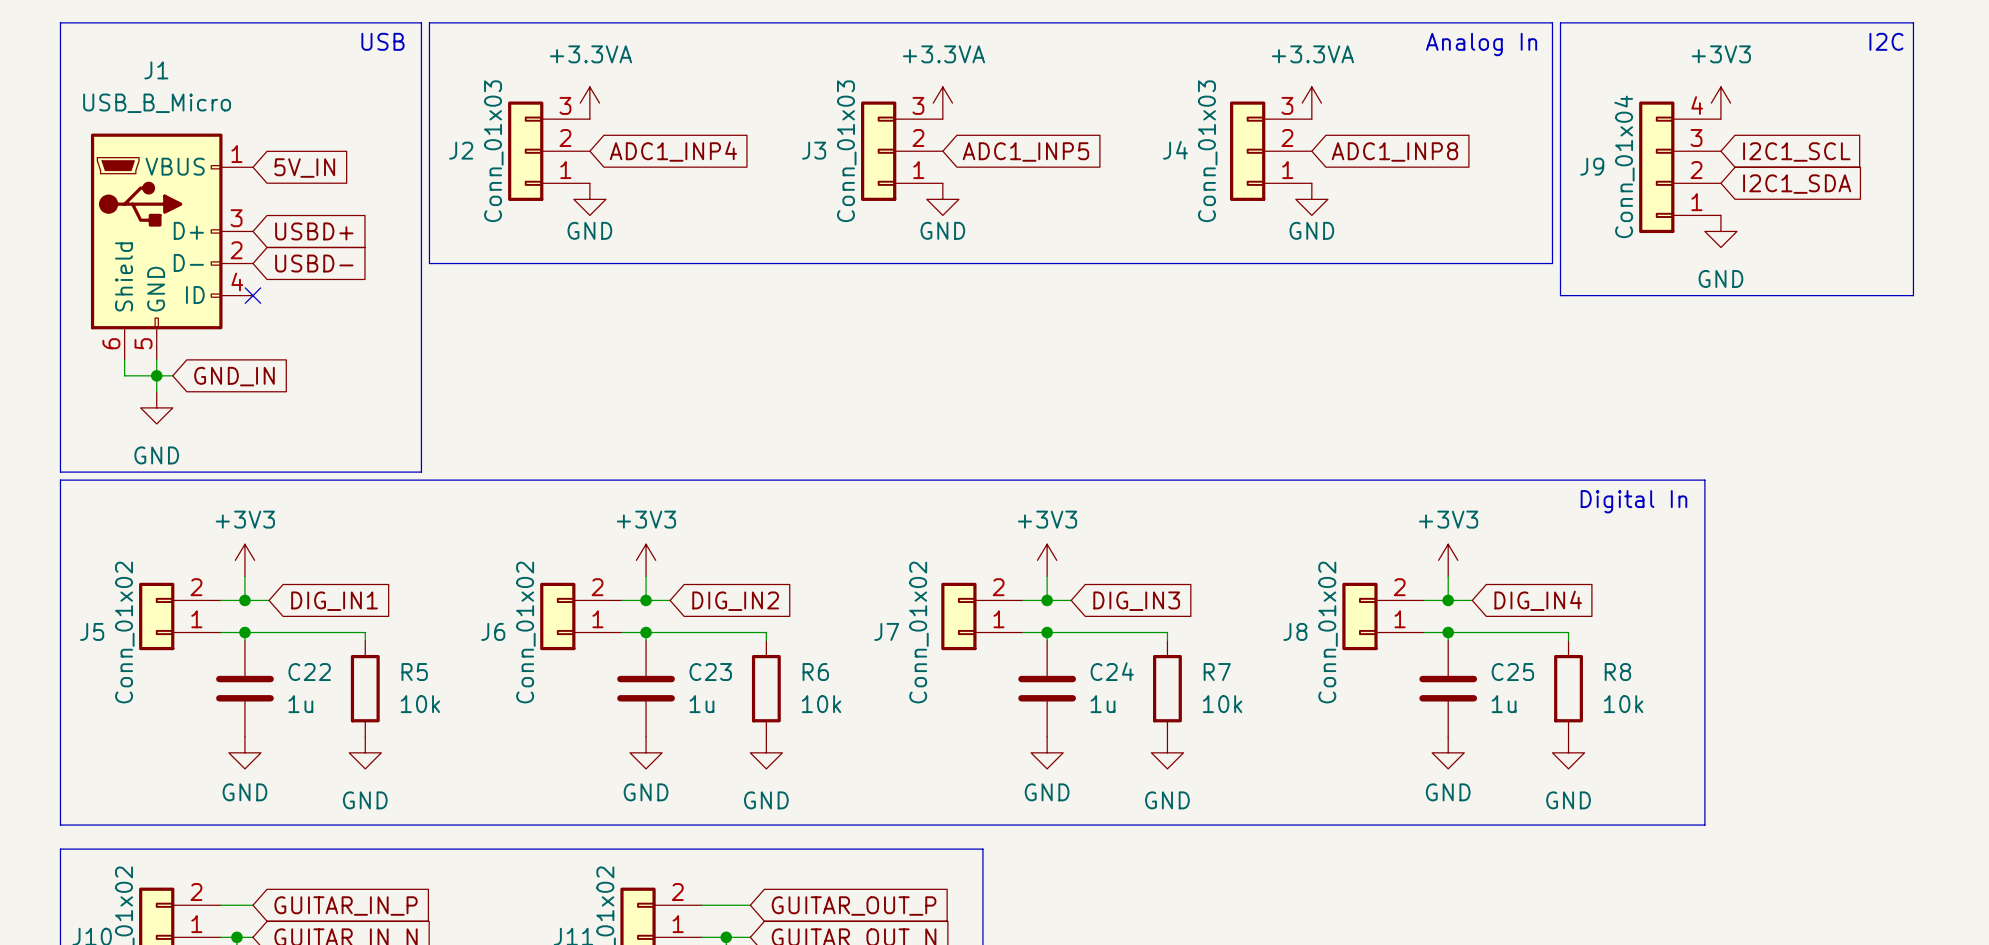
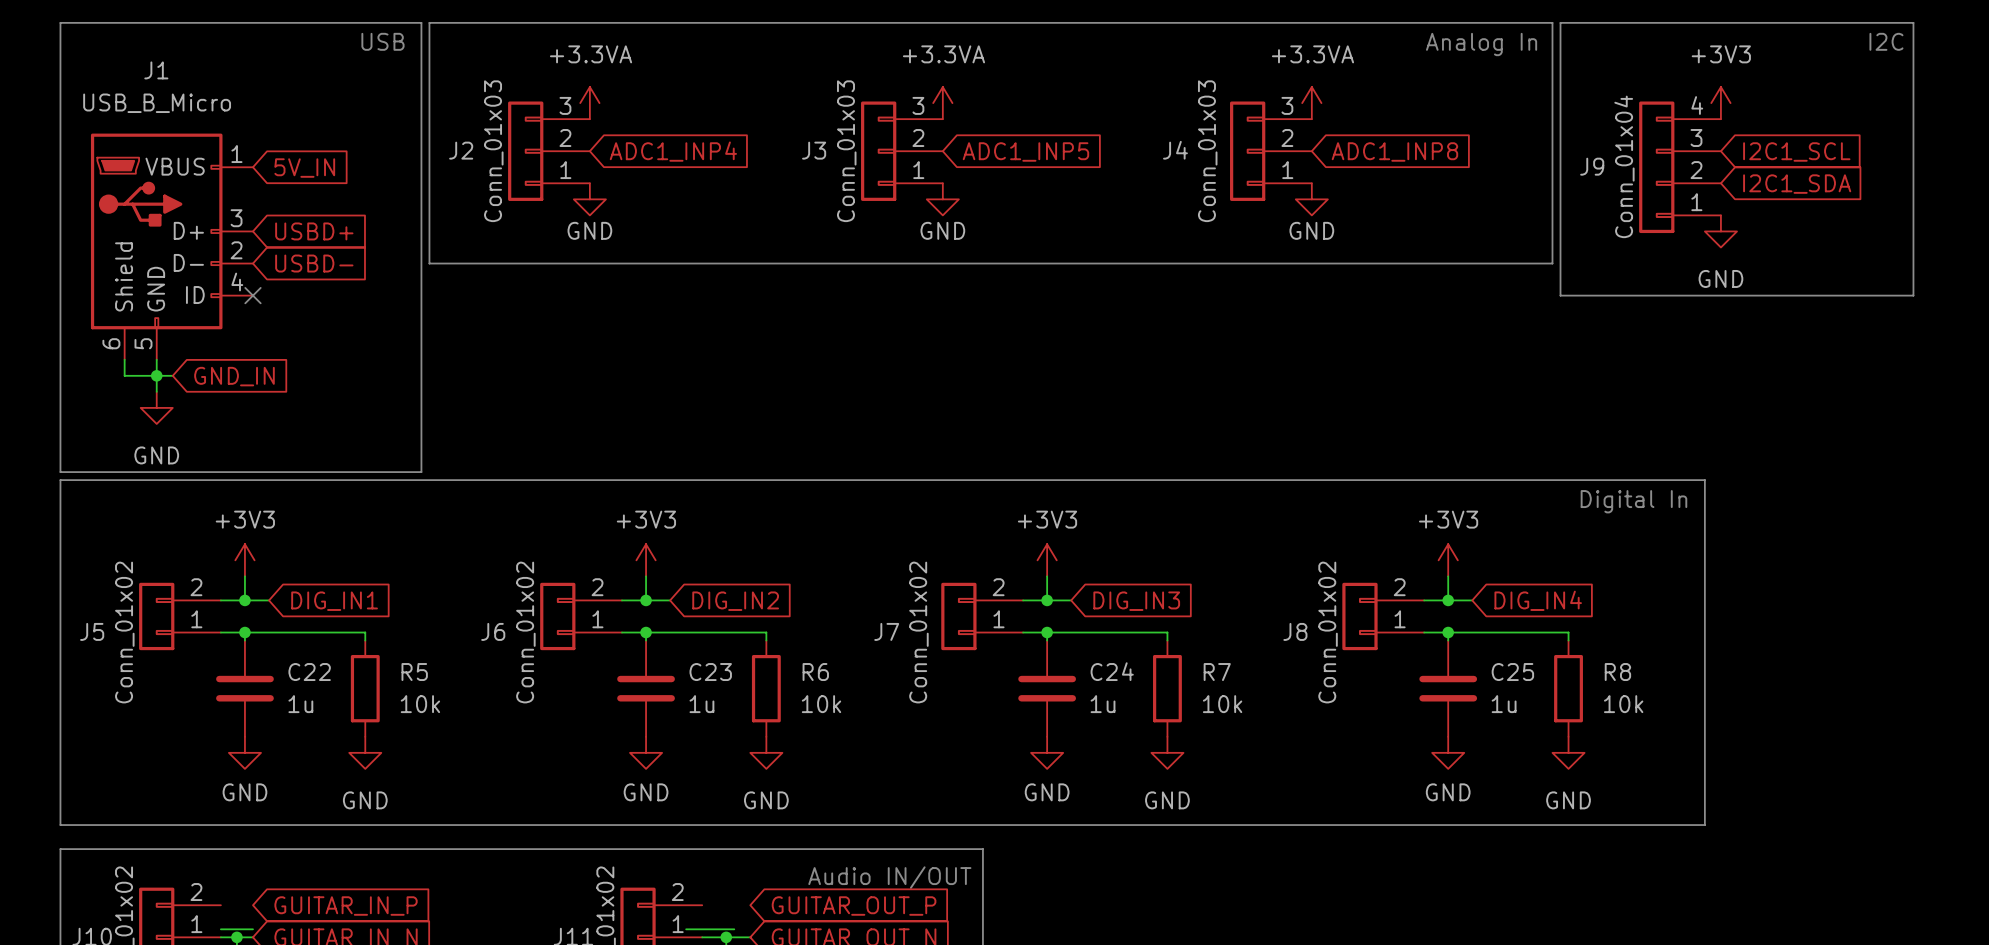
text: none -> Audio IN/OUT (889, 877)
wire: (220, 905) (252, 905) -> (220, 929) (252, 929)
wire: (702, 905) (750, 905) -> (686, 929) (734, 929)

